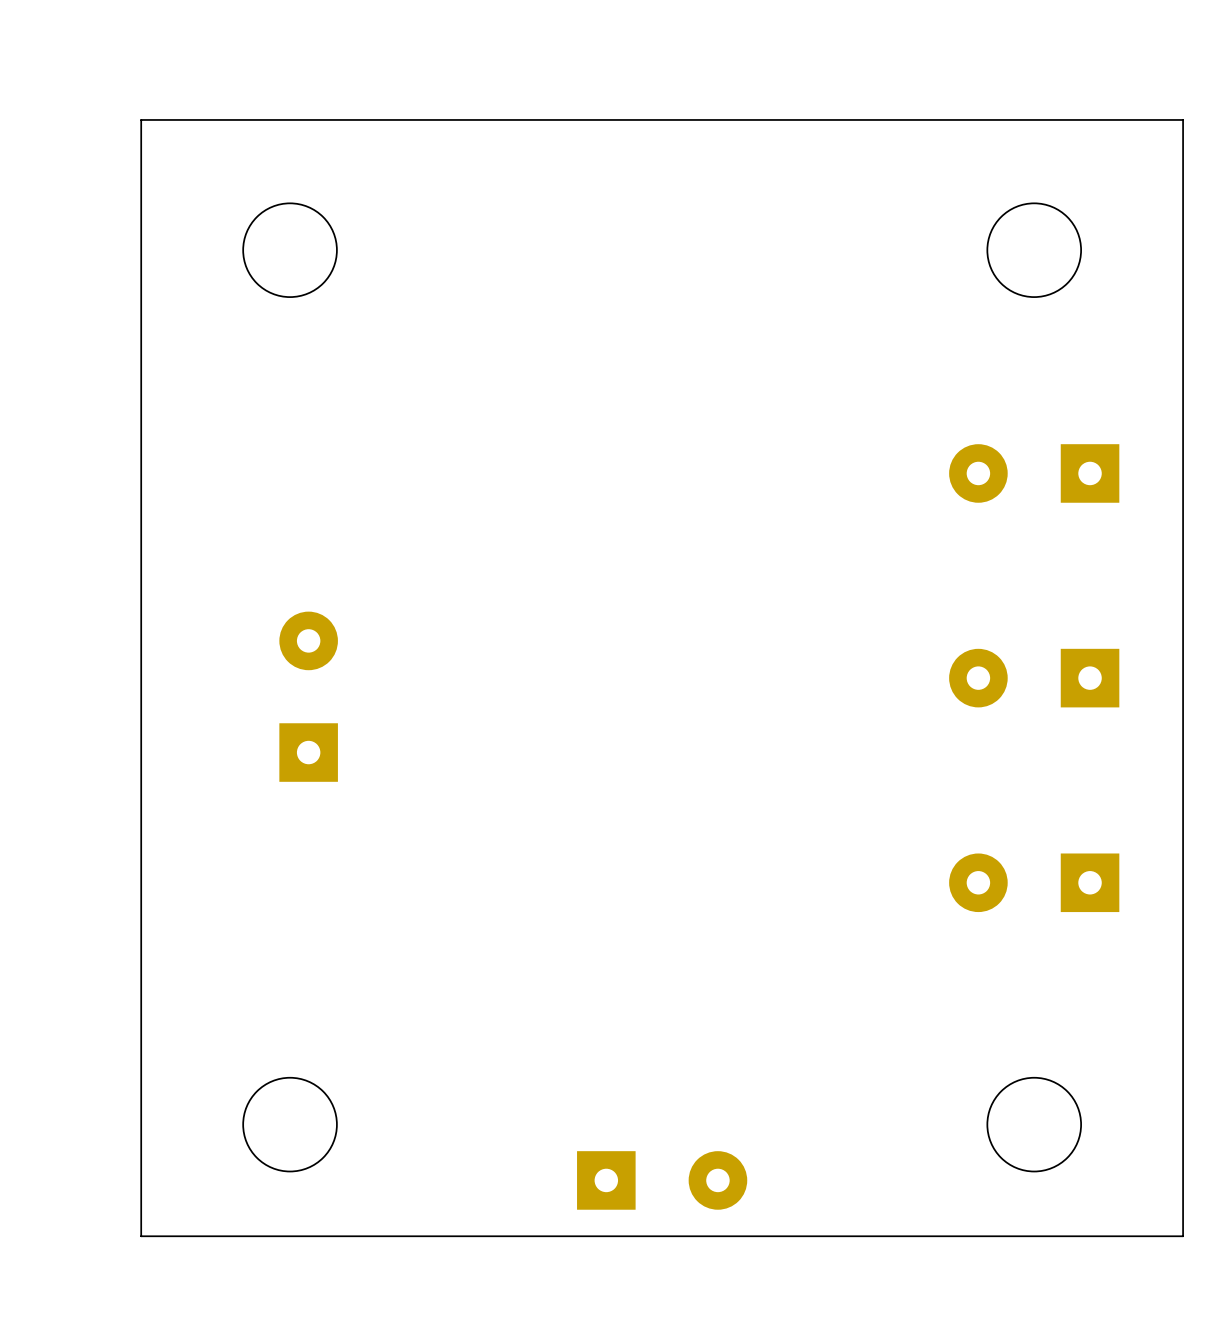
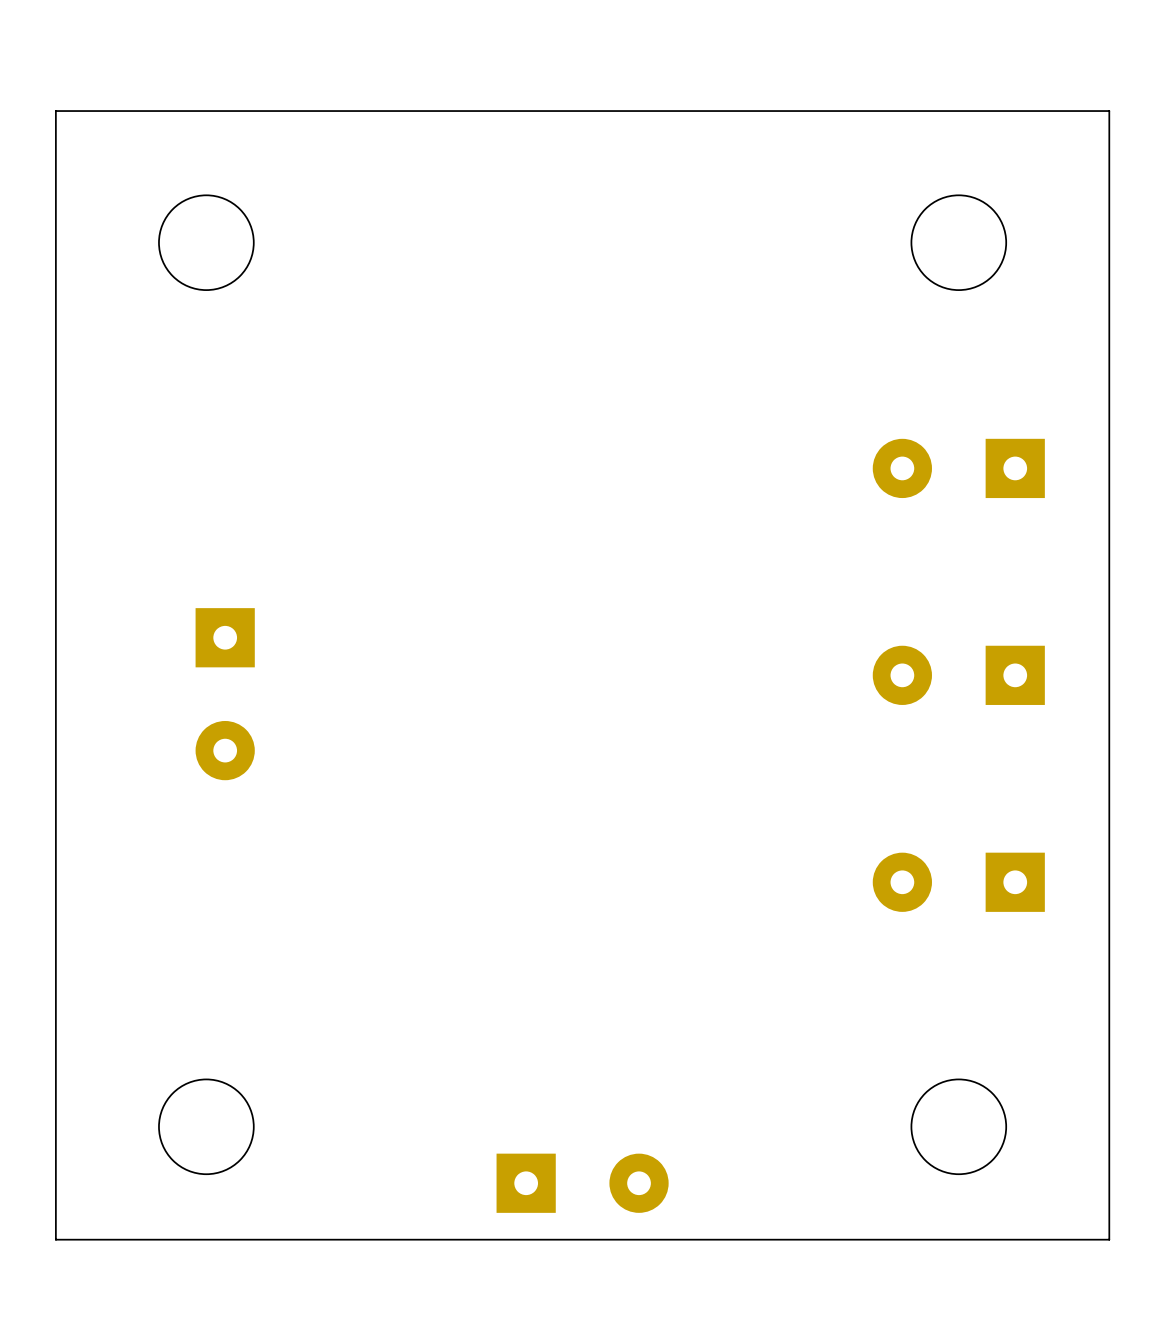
part rotation: 0° (308, 696) -> 180° (225, 694)

